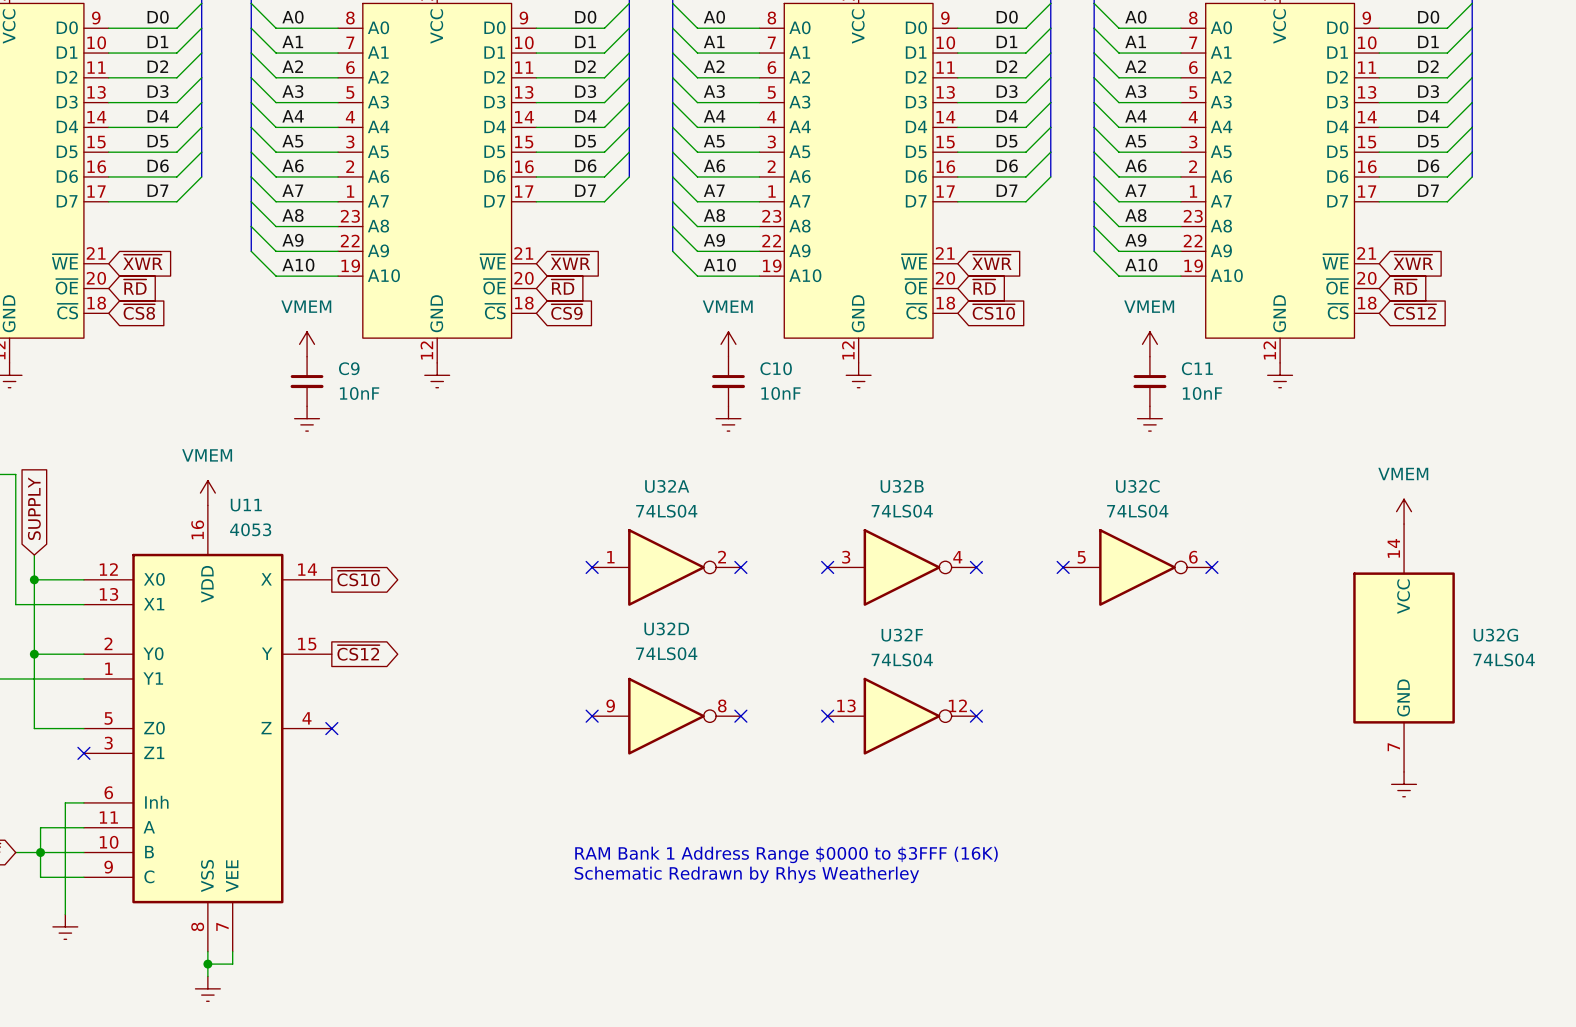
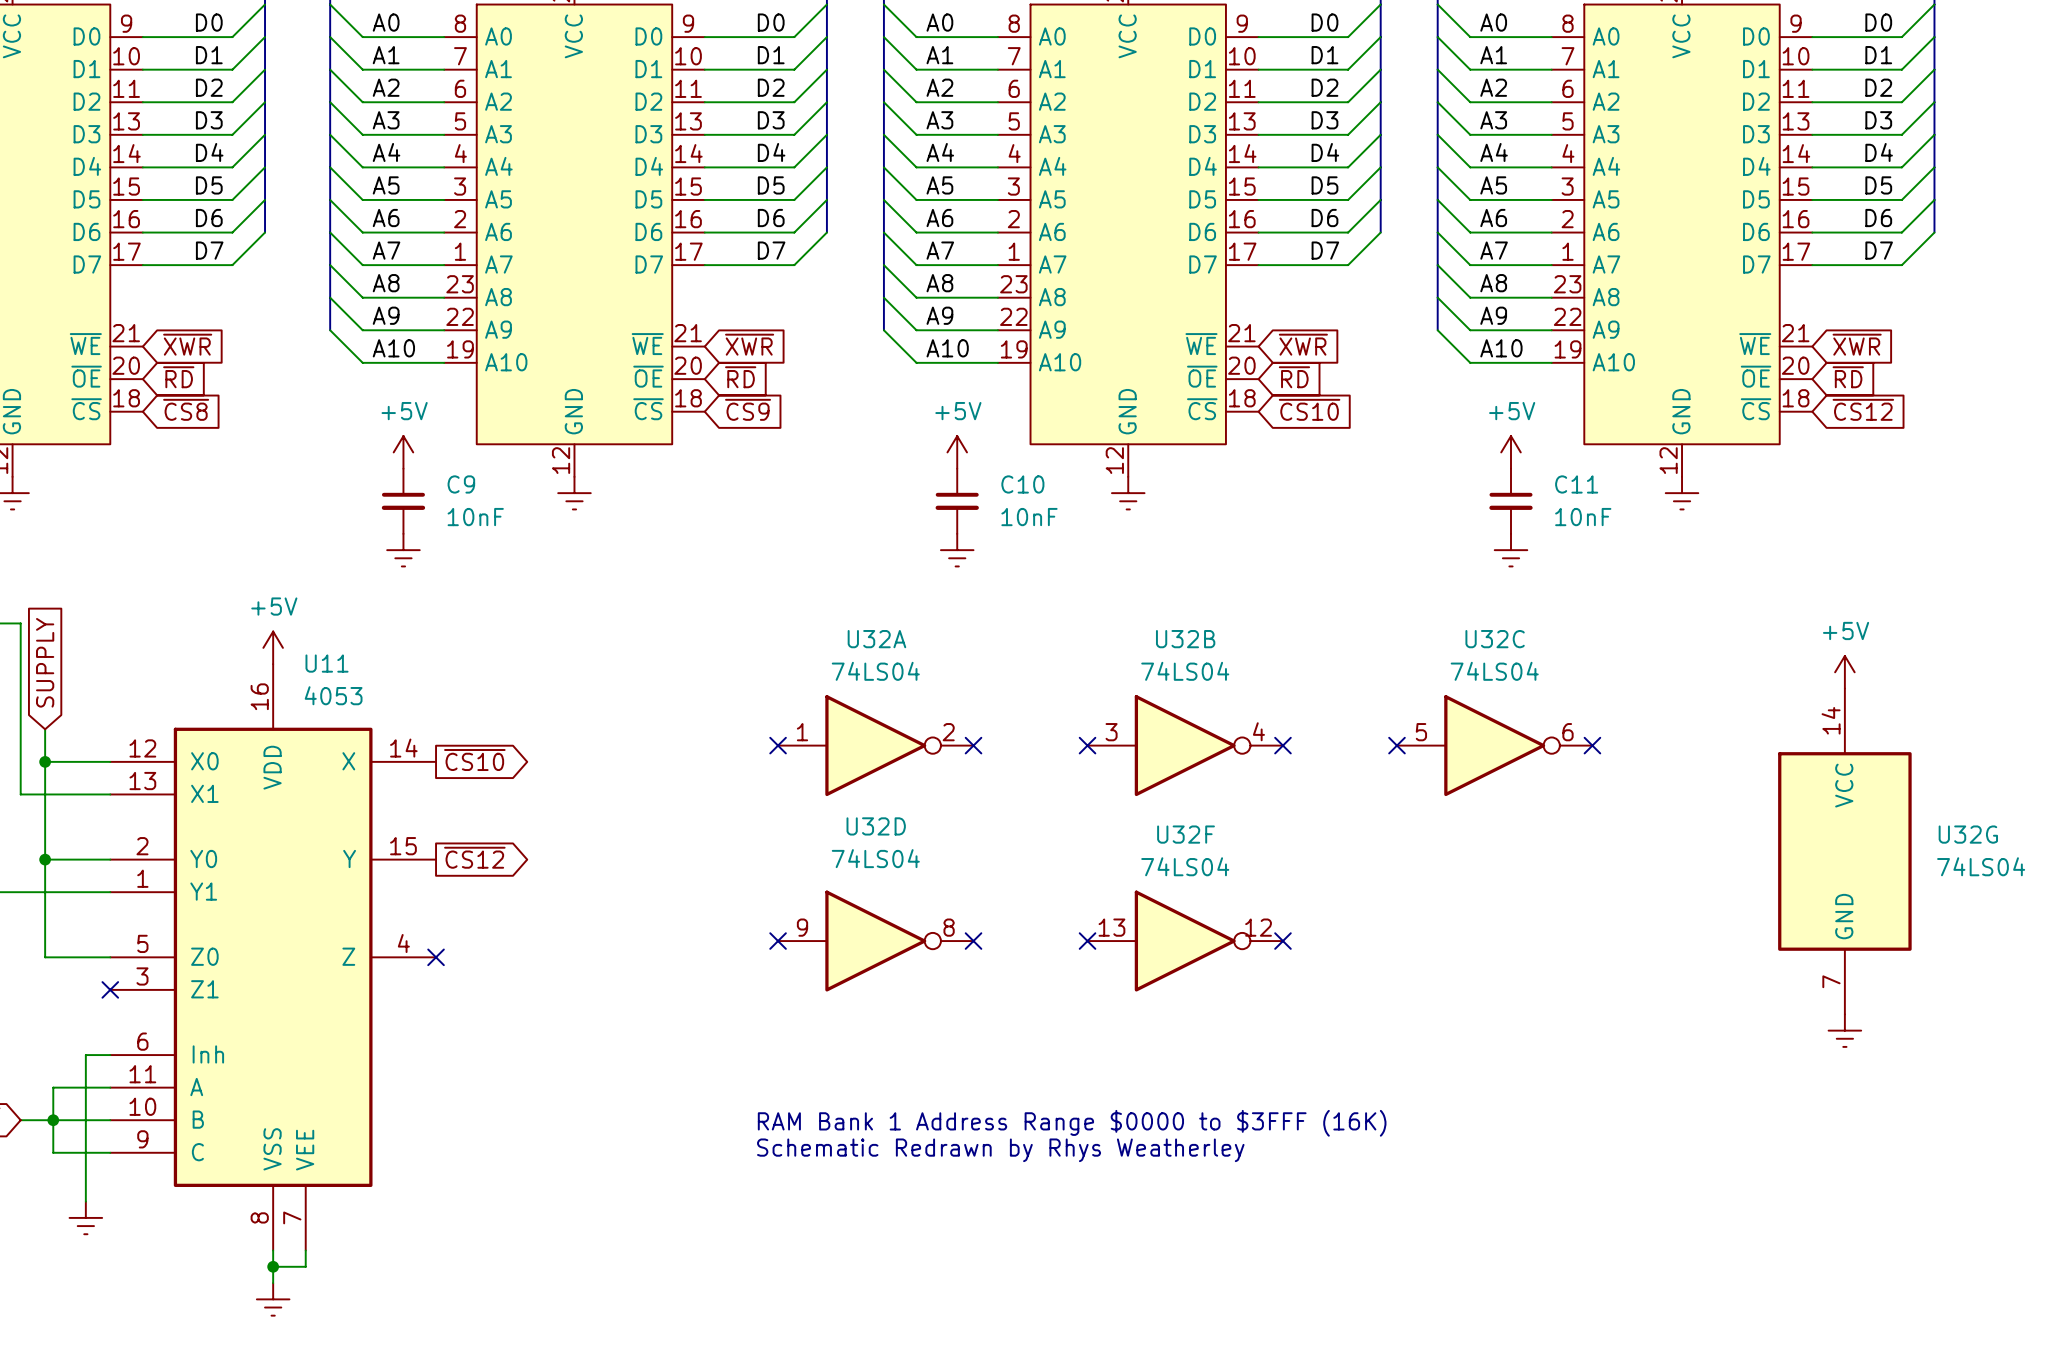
power symbol: VMEM (307, 344) -> +5V (403, 452)
power symbol: VMEM (728, 344) -> +5V (957, 452)
power symbol: VMEM (1149, 344) -> +5V (1511, 452)
power symbol: VMEM (207, 493) -> +5V (273, 647)
power symbol: VMEM (1404, 511) -> +5V (1844, 672)

